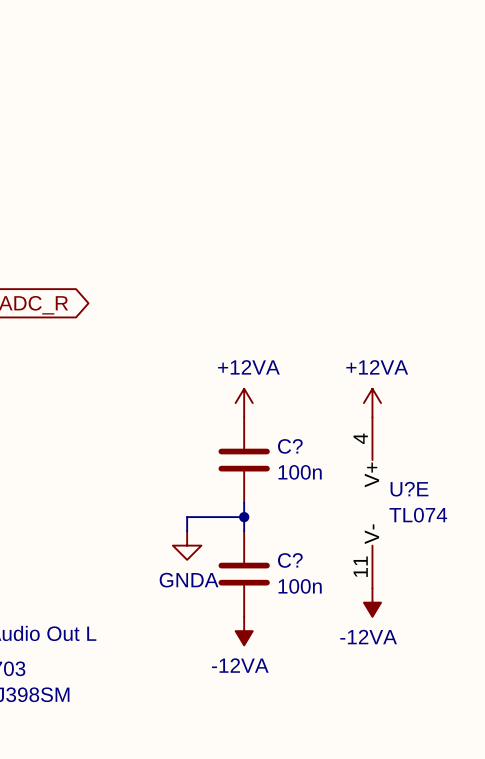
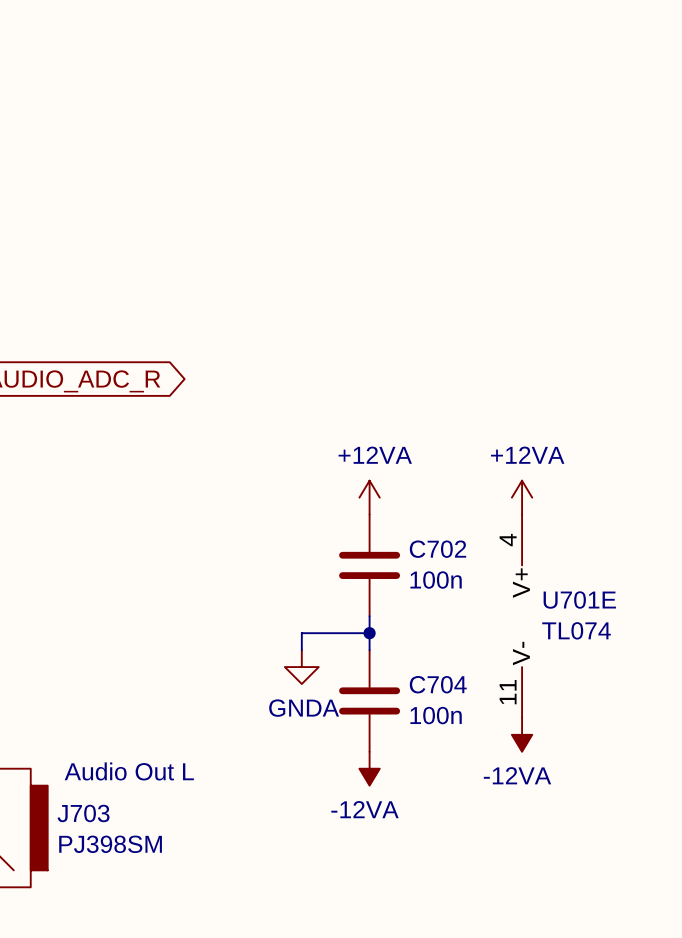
C? name: C? (290, 446) -> C702 (437, 549)
U?E name: U?E (409, 489) -> U701E (579, 600)
C? name: C? (290, 560) -> C704 (438, 684)

